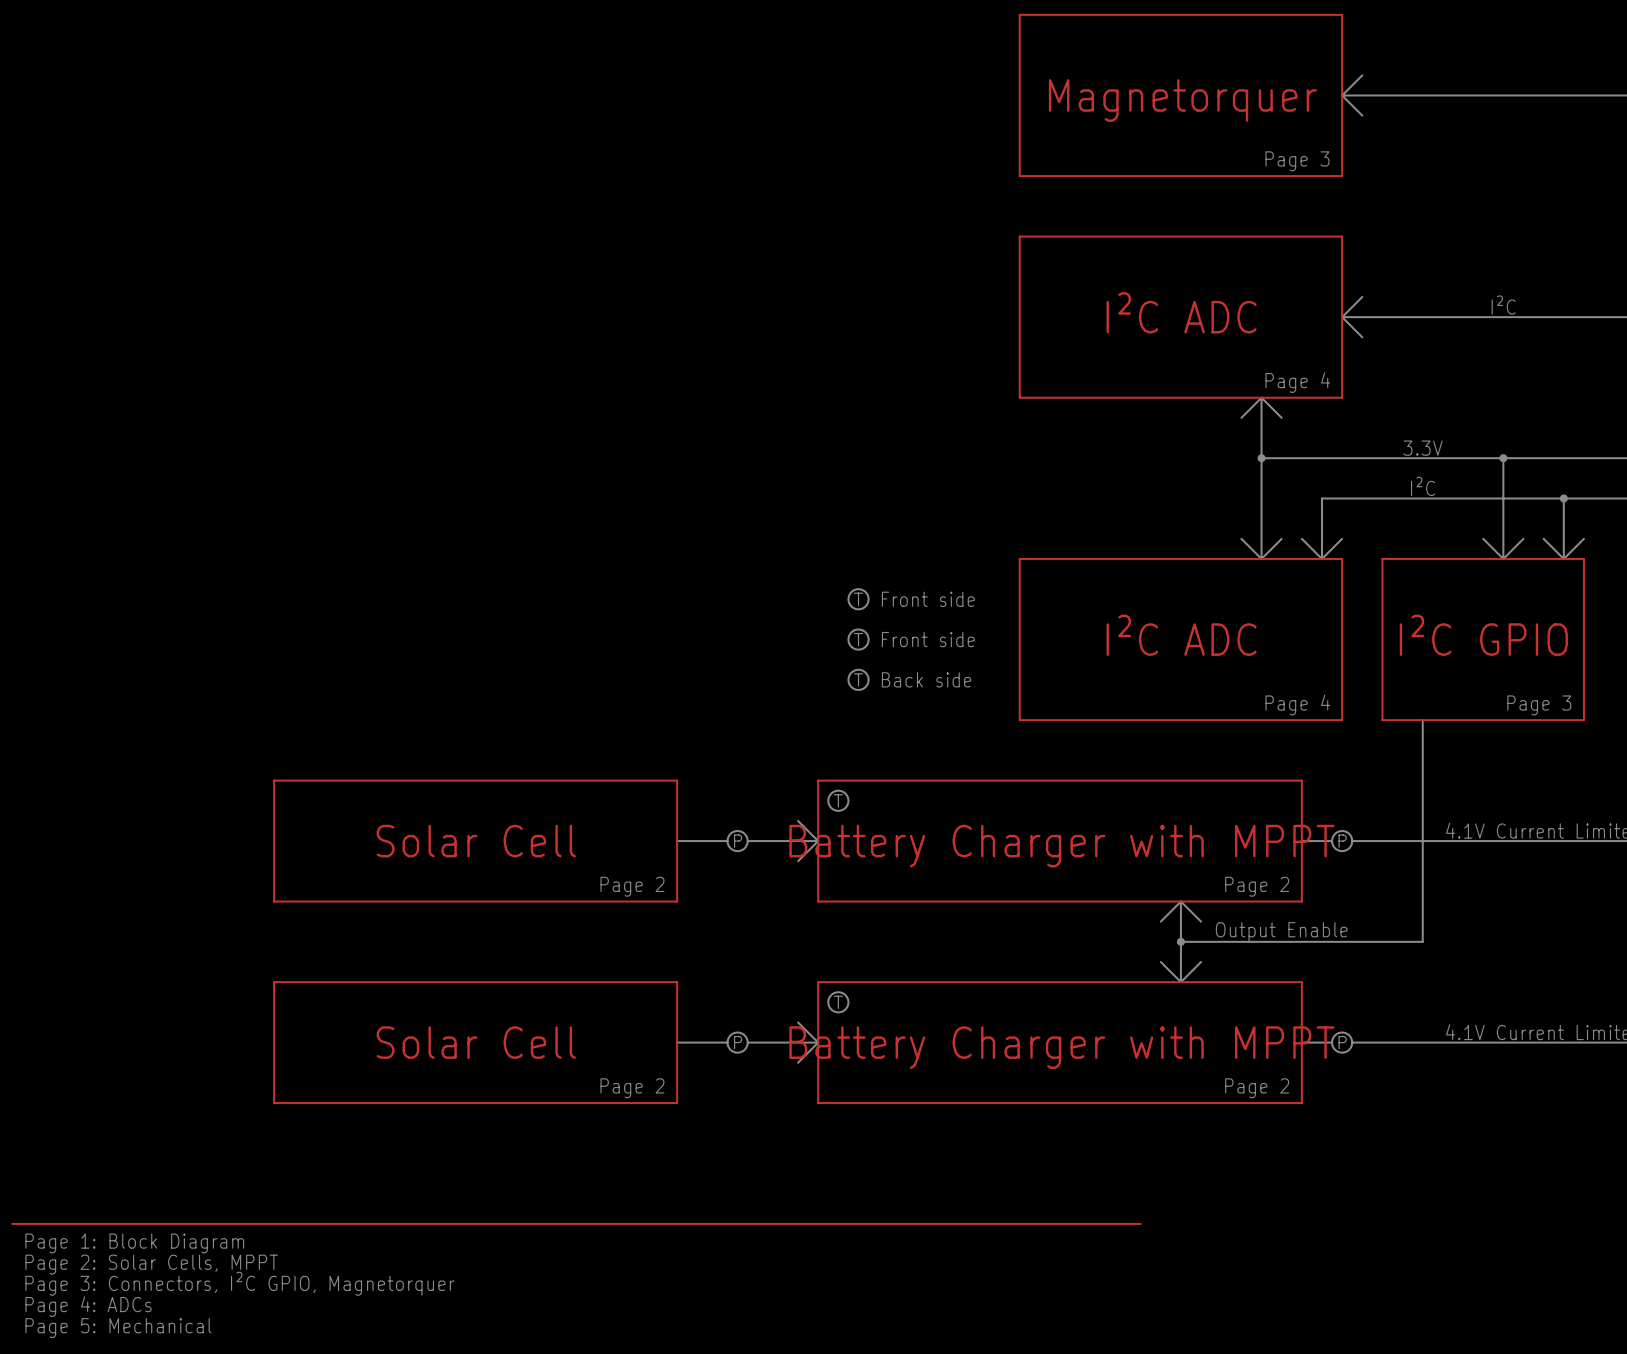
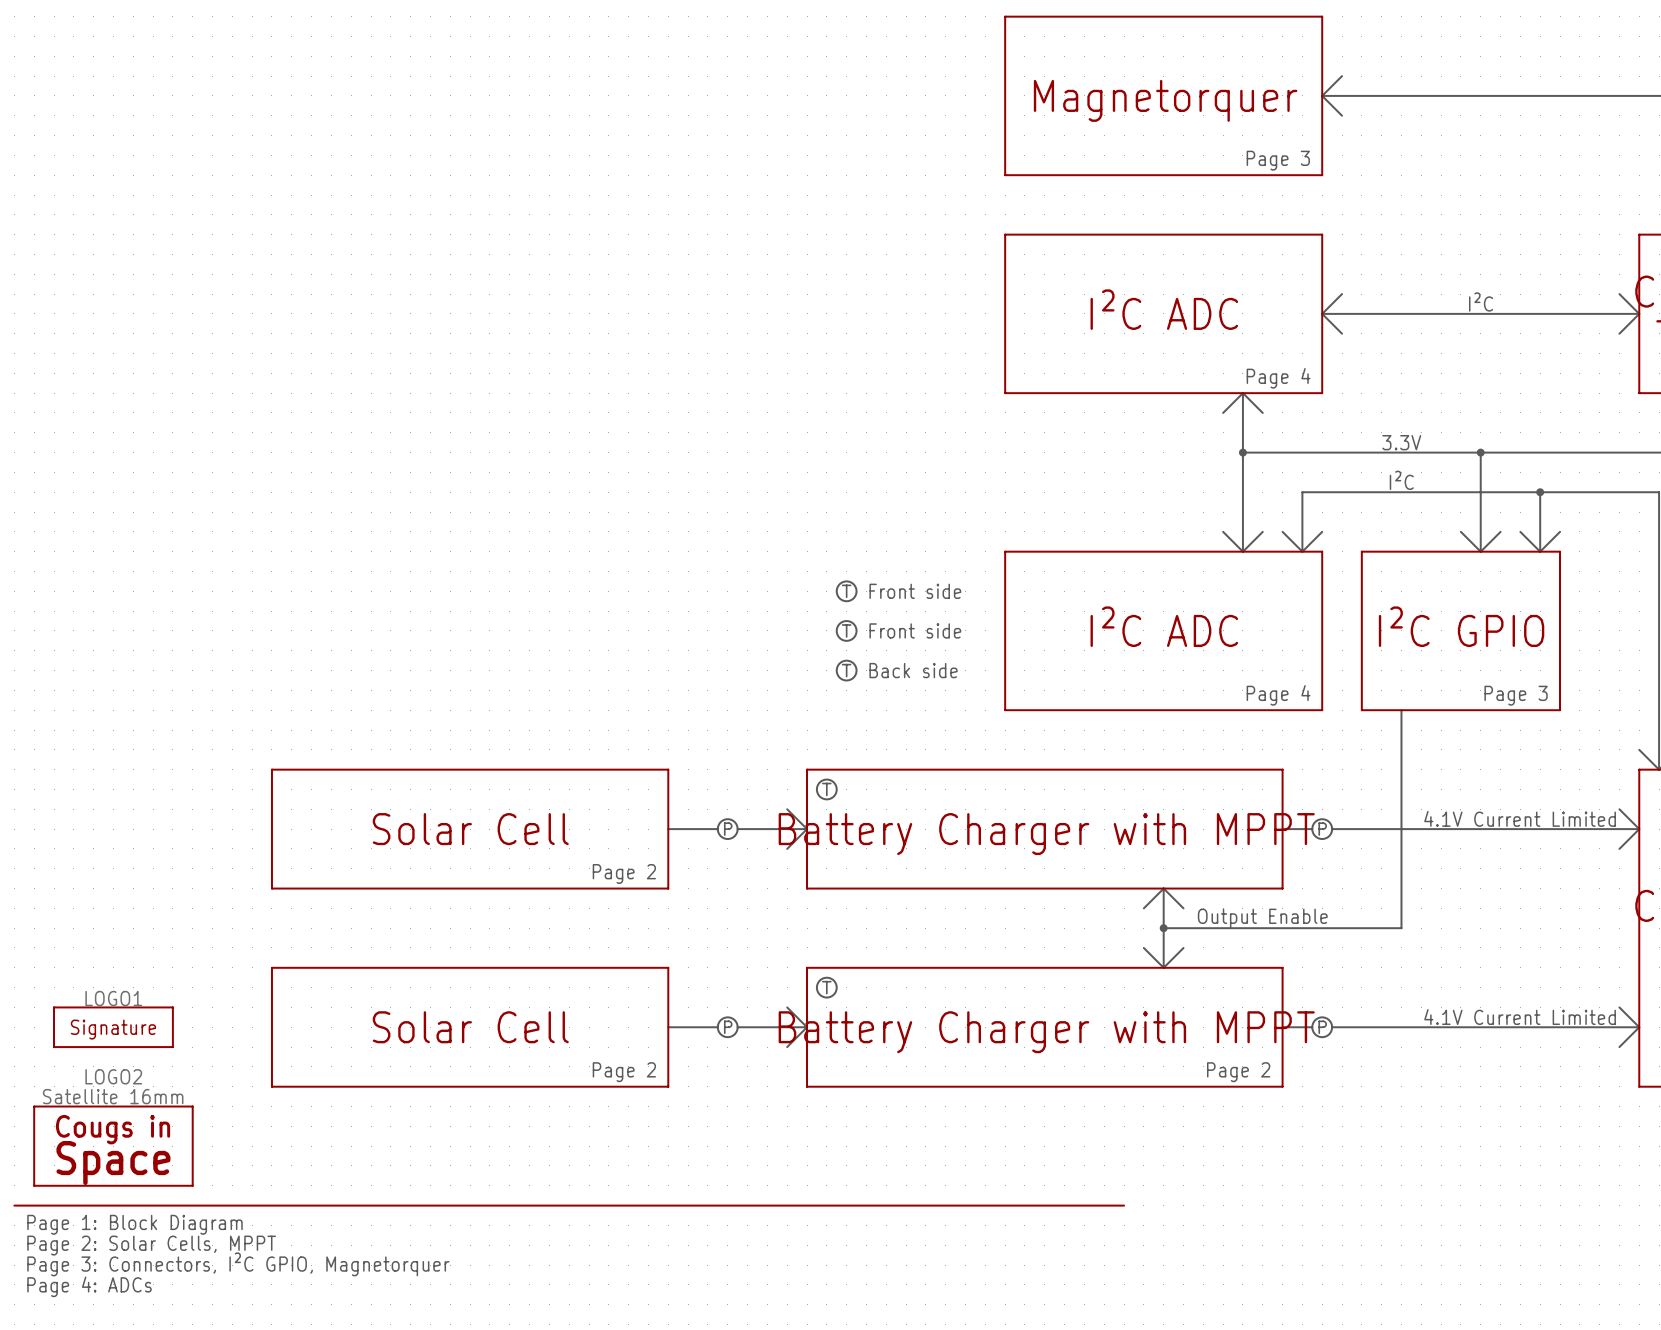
text: Page 2 (1257, 886) -> none
LOGO1: none -> (113, 1027)
LOGO2: none -> Satellite 16mm (113, 1146)
text: Page 5: Mechanical (118, 1328) -> none

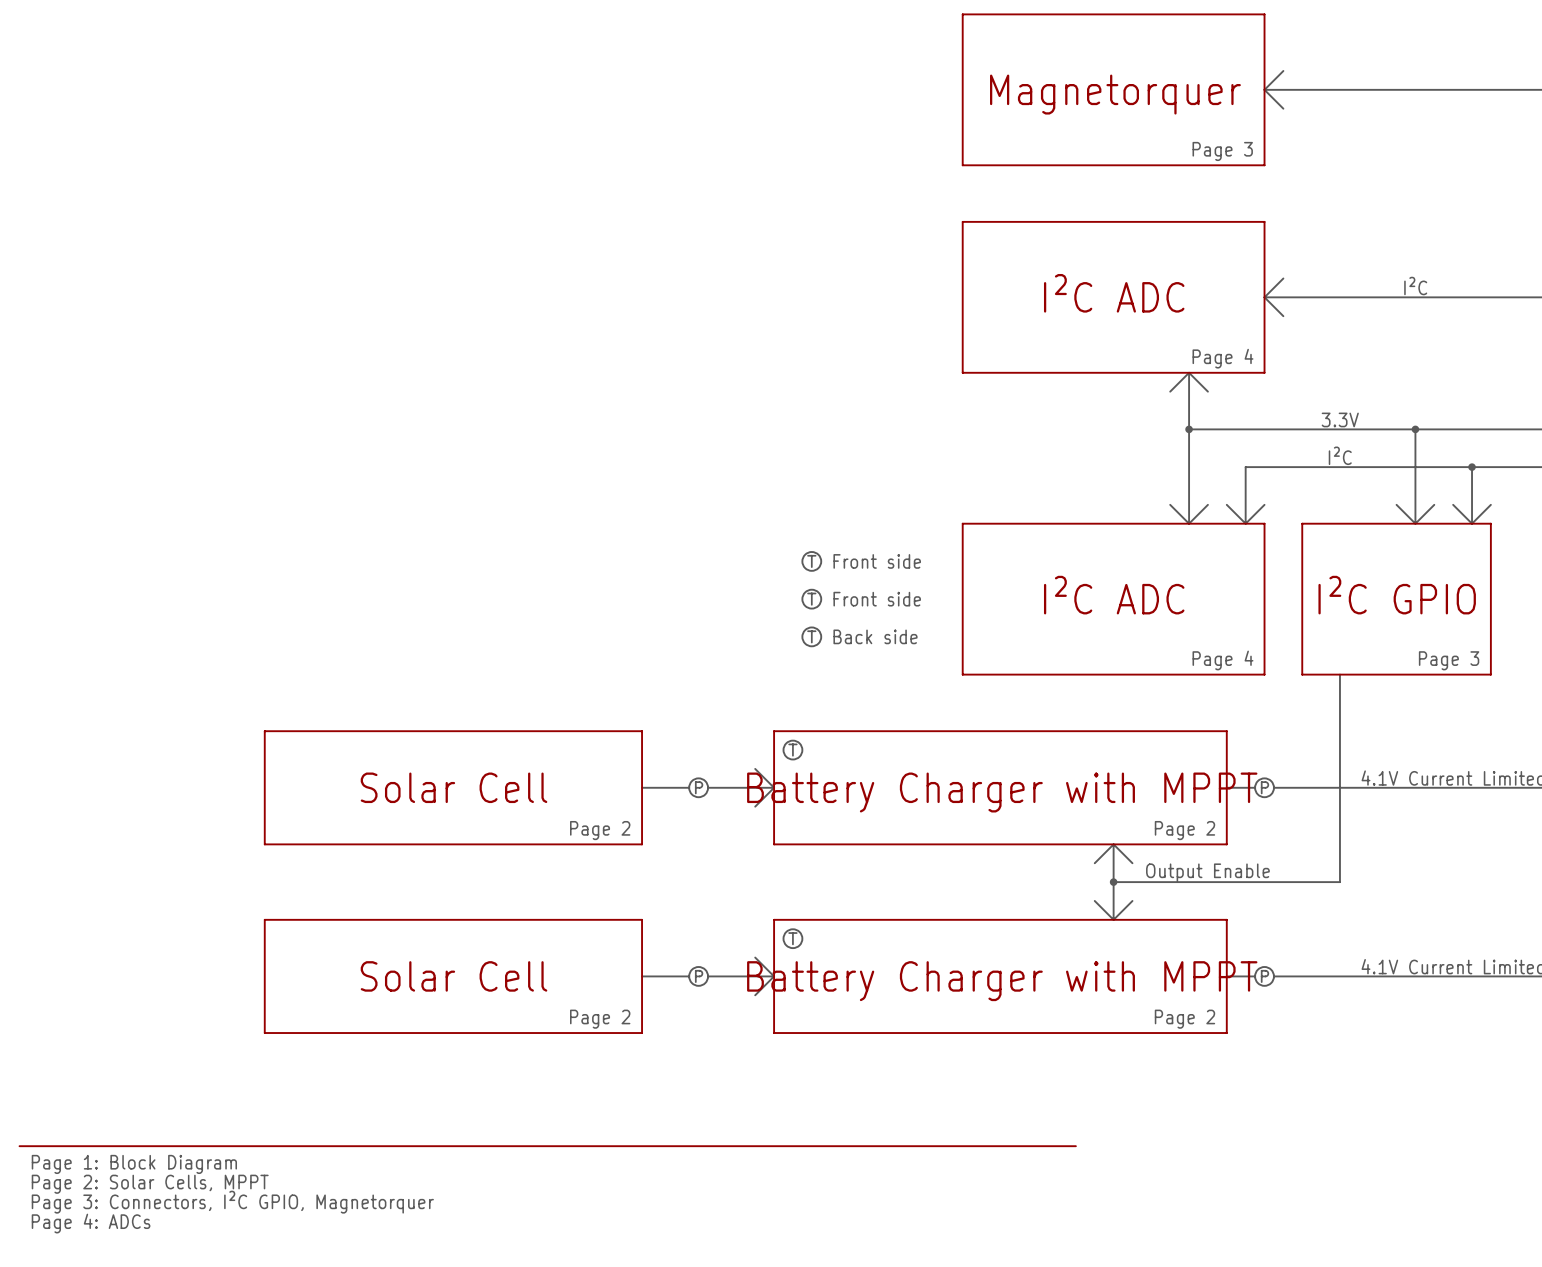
text: none -> Page 2 (1184, 830)
LOGO1: (113, 1027) -> none
LOGO2: Satellite 16mm (113, 1146) -> none

